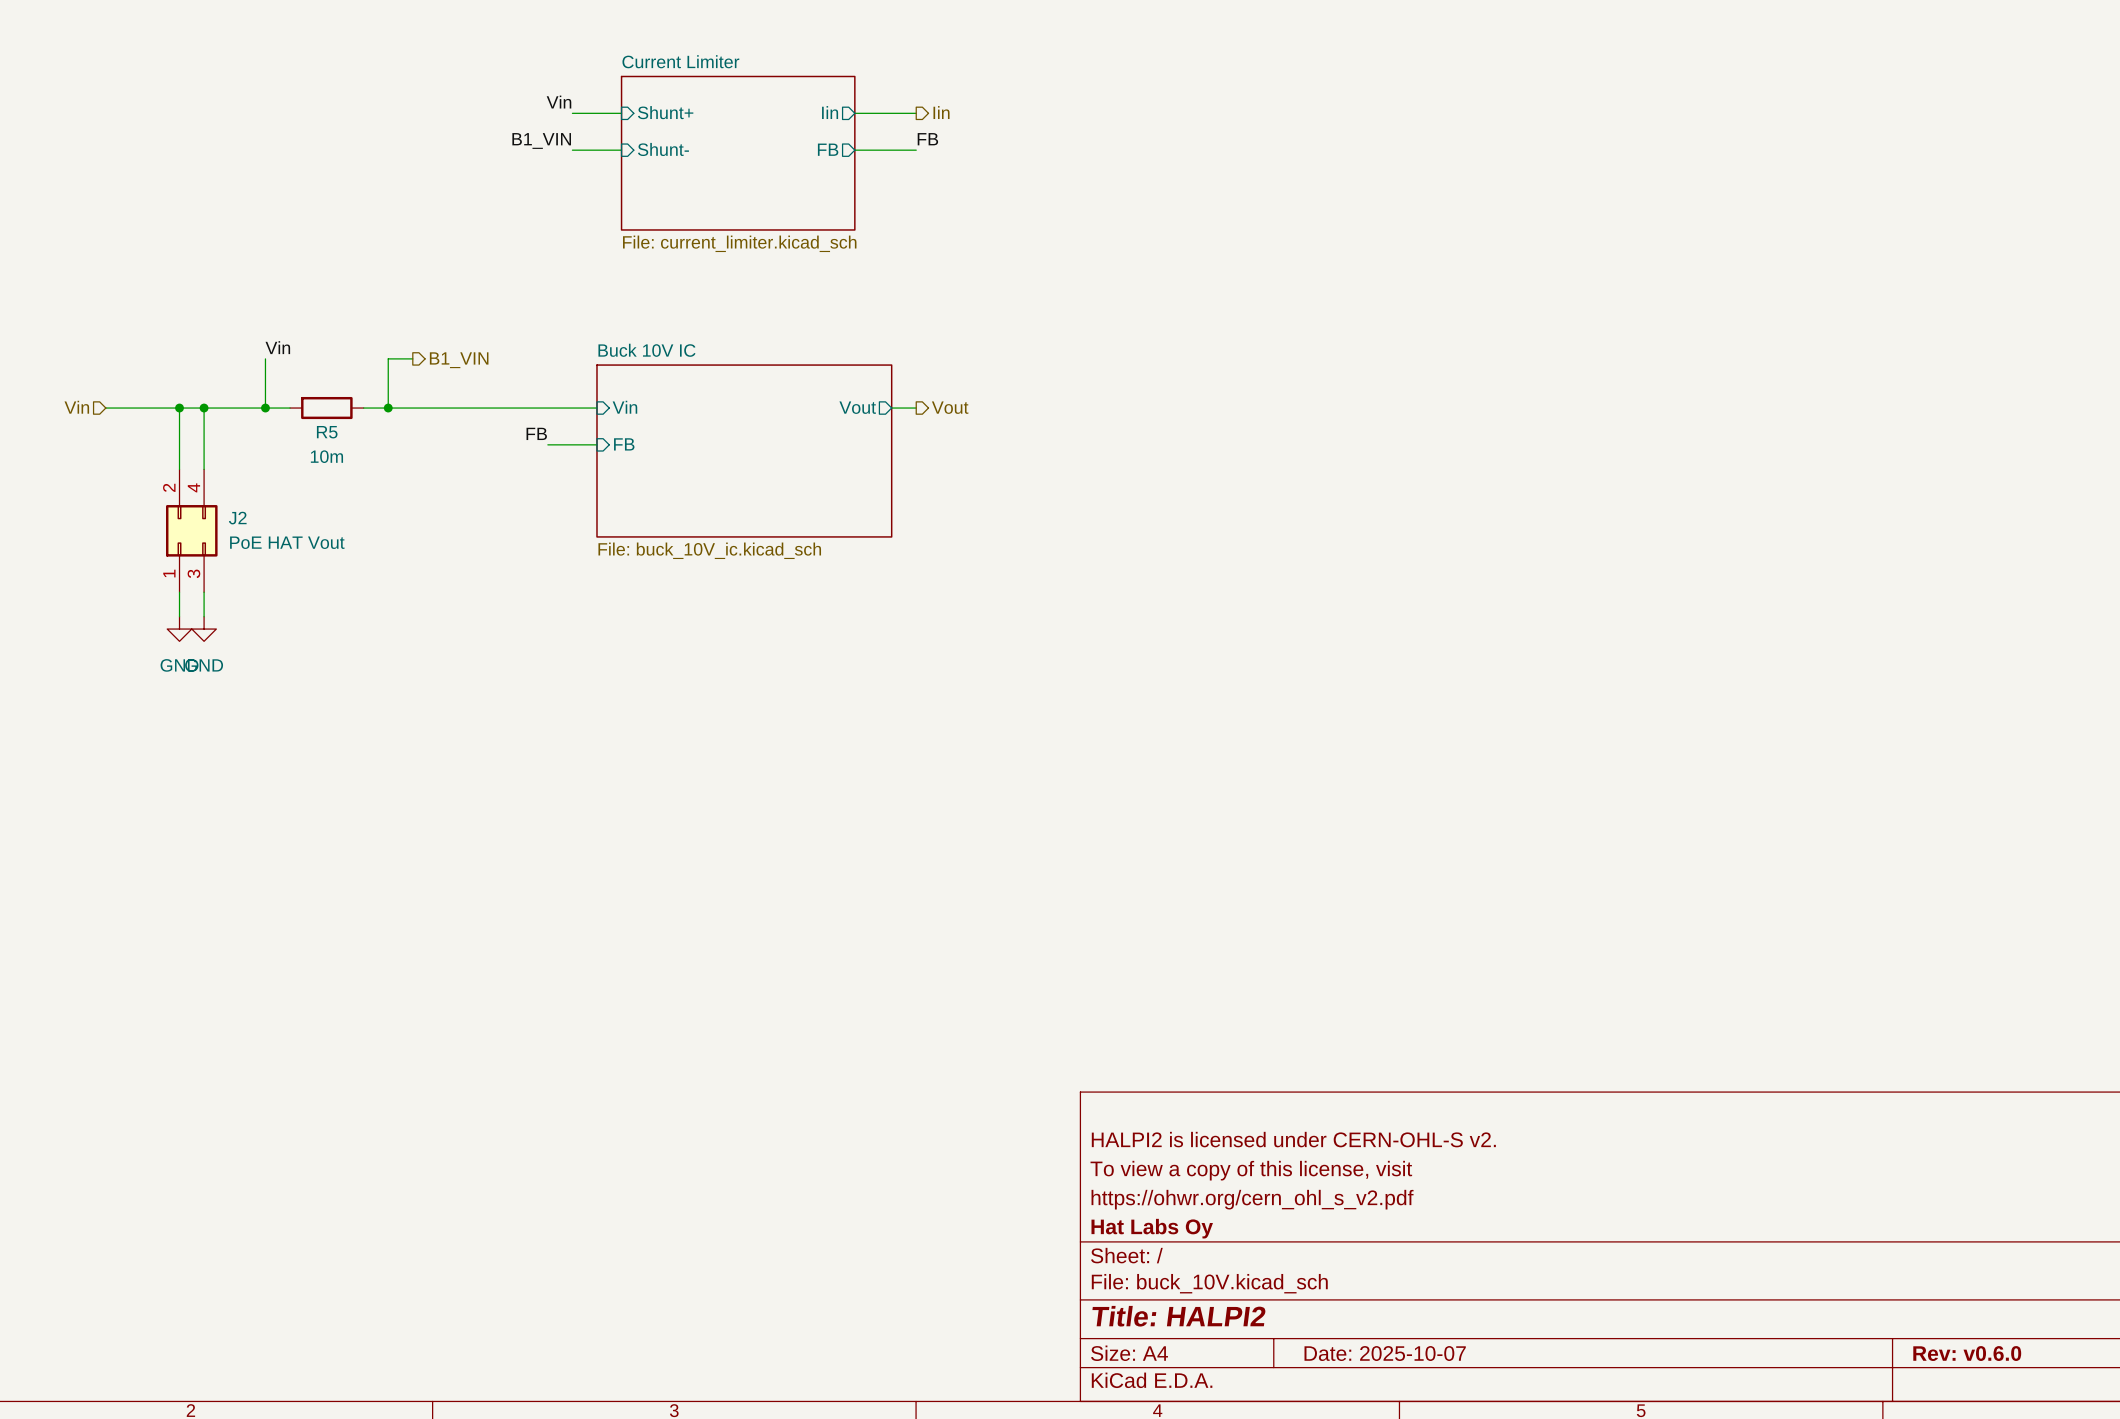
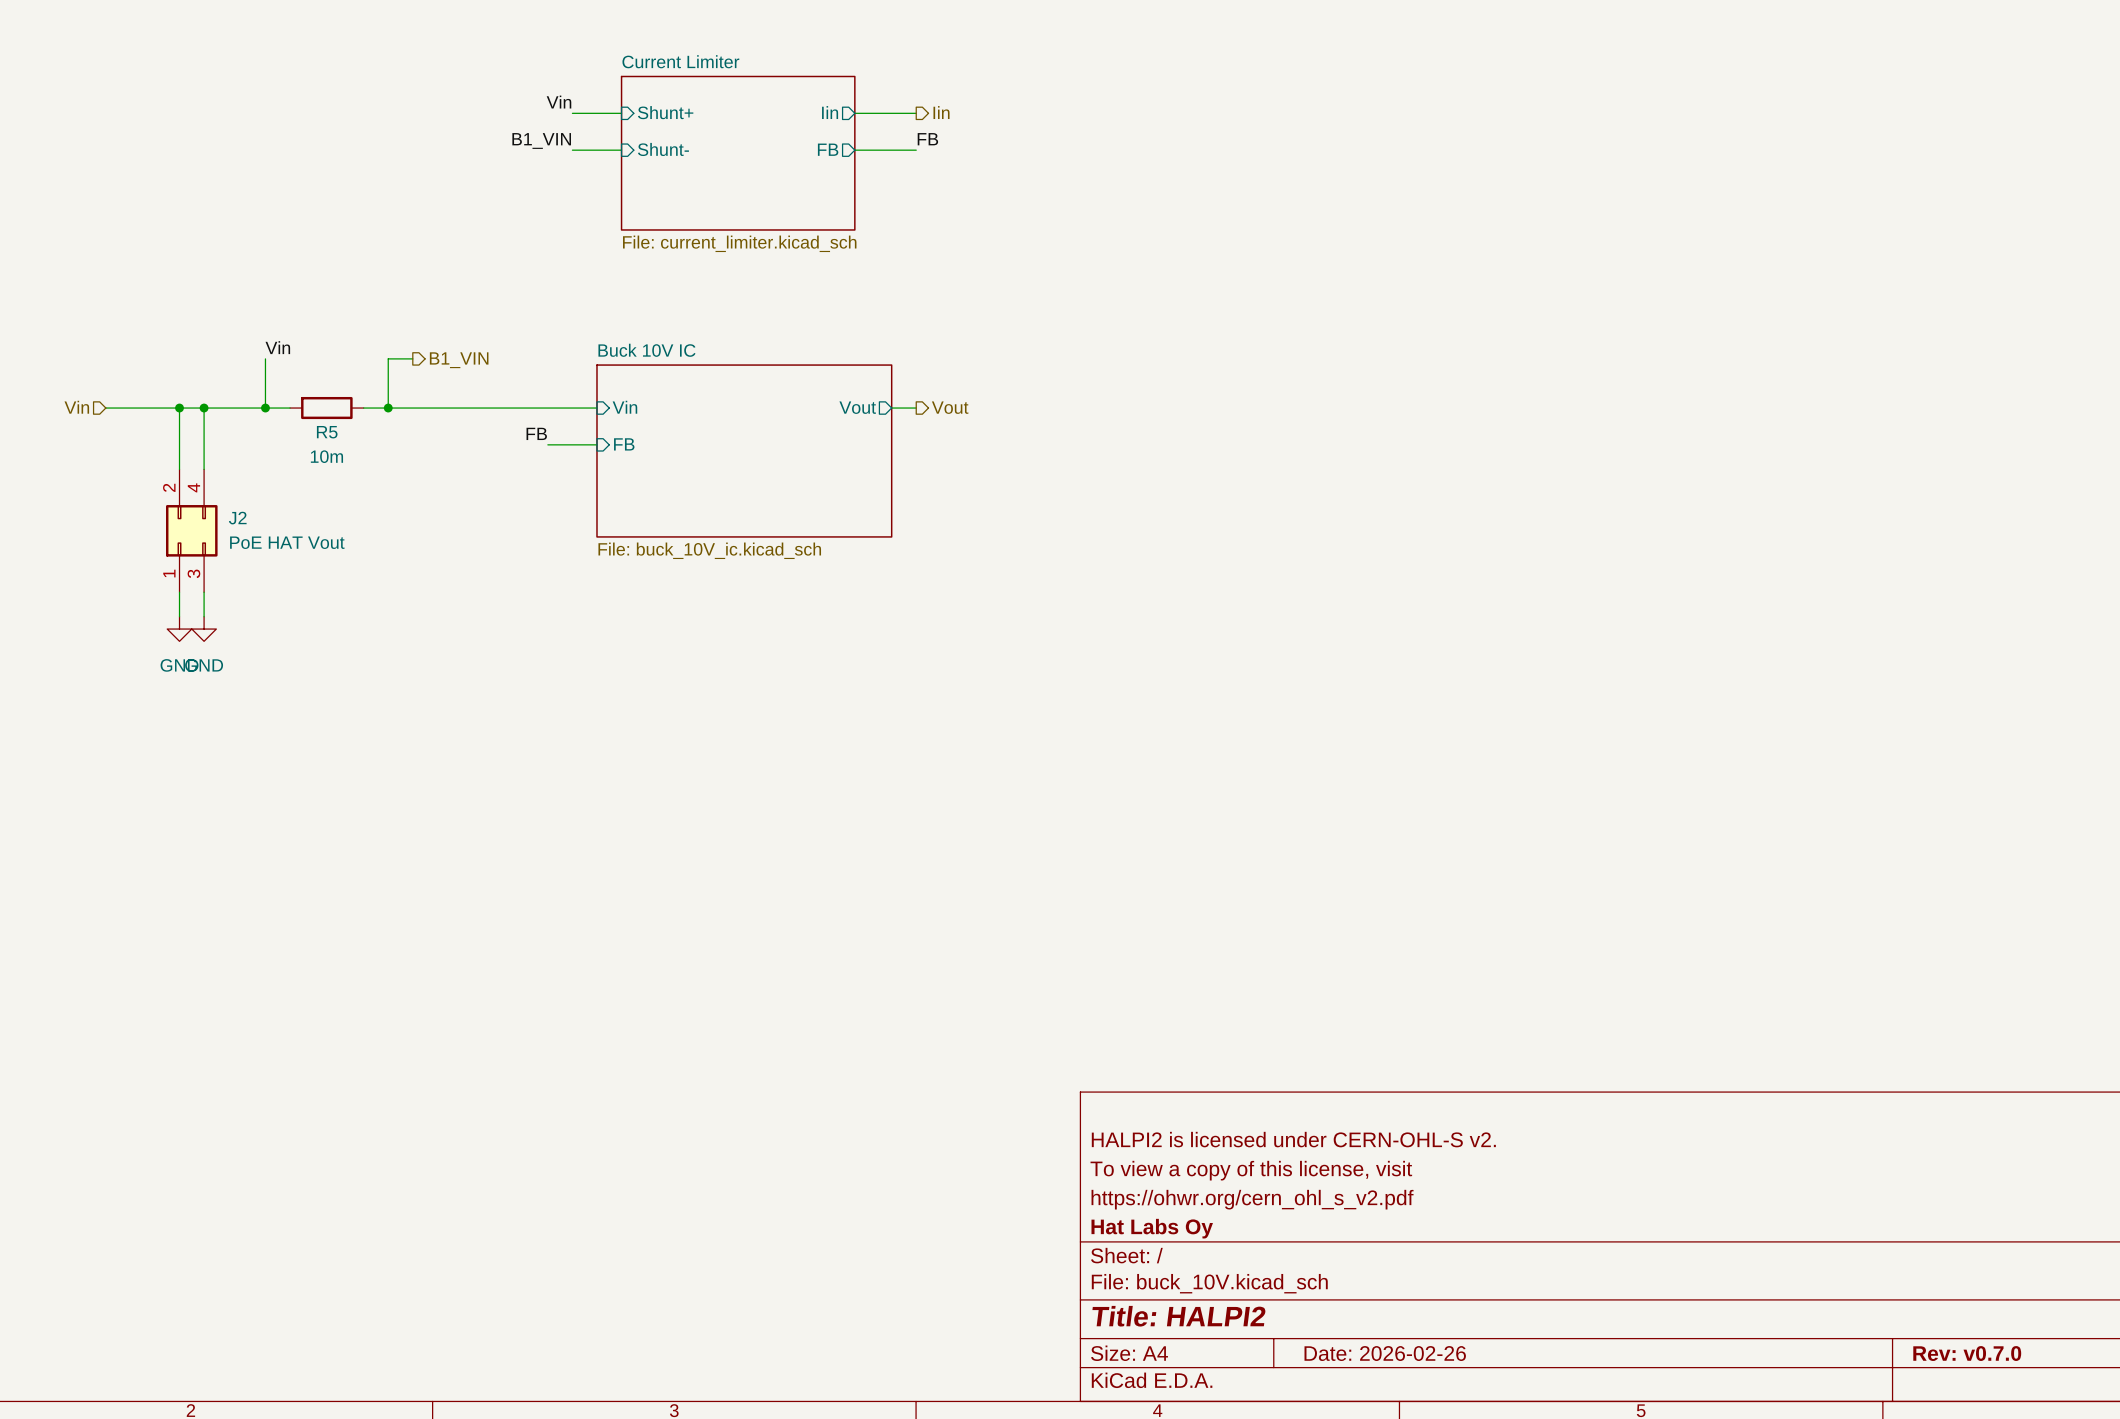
title block: Date: 2025-10-07 (1385, 1353) -> Date: 2026-02-26 (1385, 1353)
title block: Rev: v0.6.0 (1967, 1353) -> Rev: v0.7.0 (1967, 1353)

